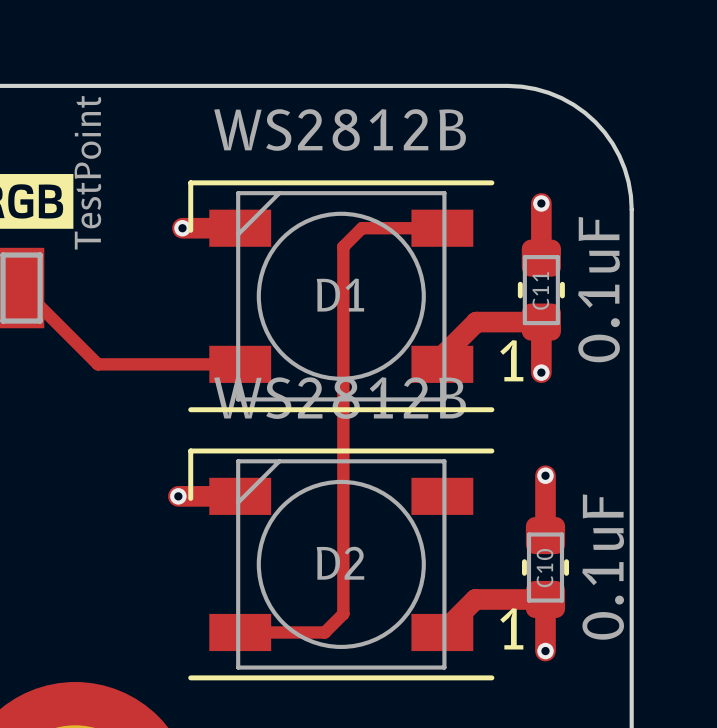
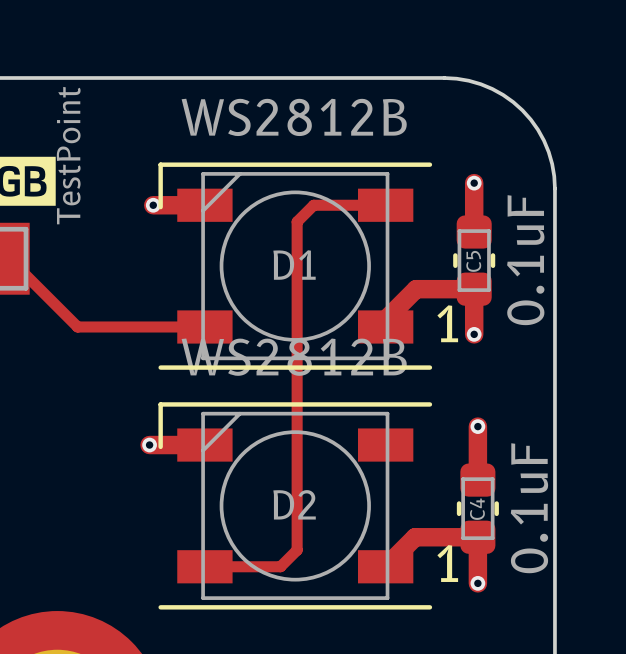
C11 name: C11 (540, 290) -> C5 (473, 261)
C10 name: C10 (544, 568) -> C4 (477, 509)

